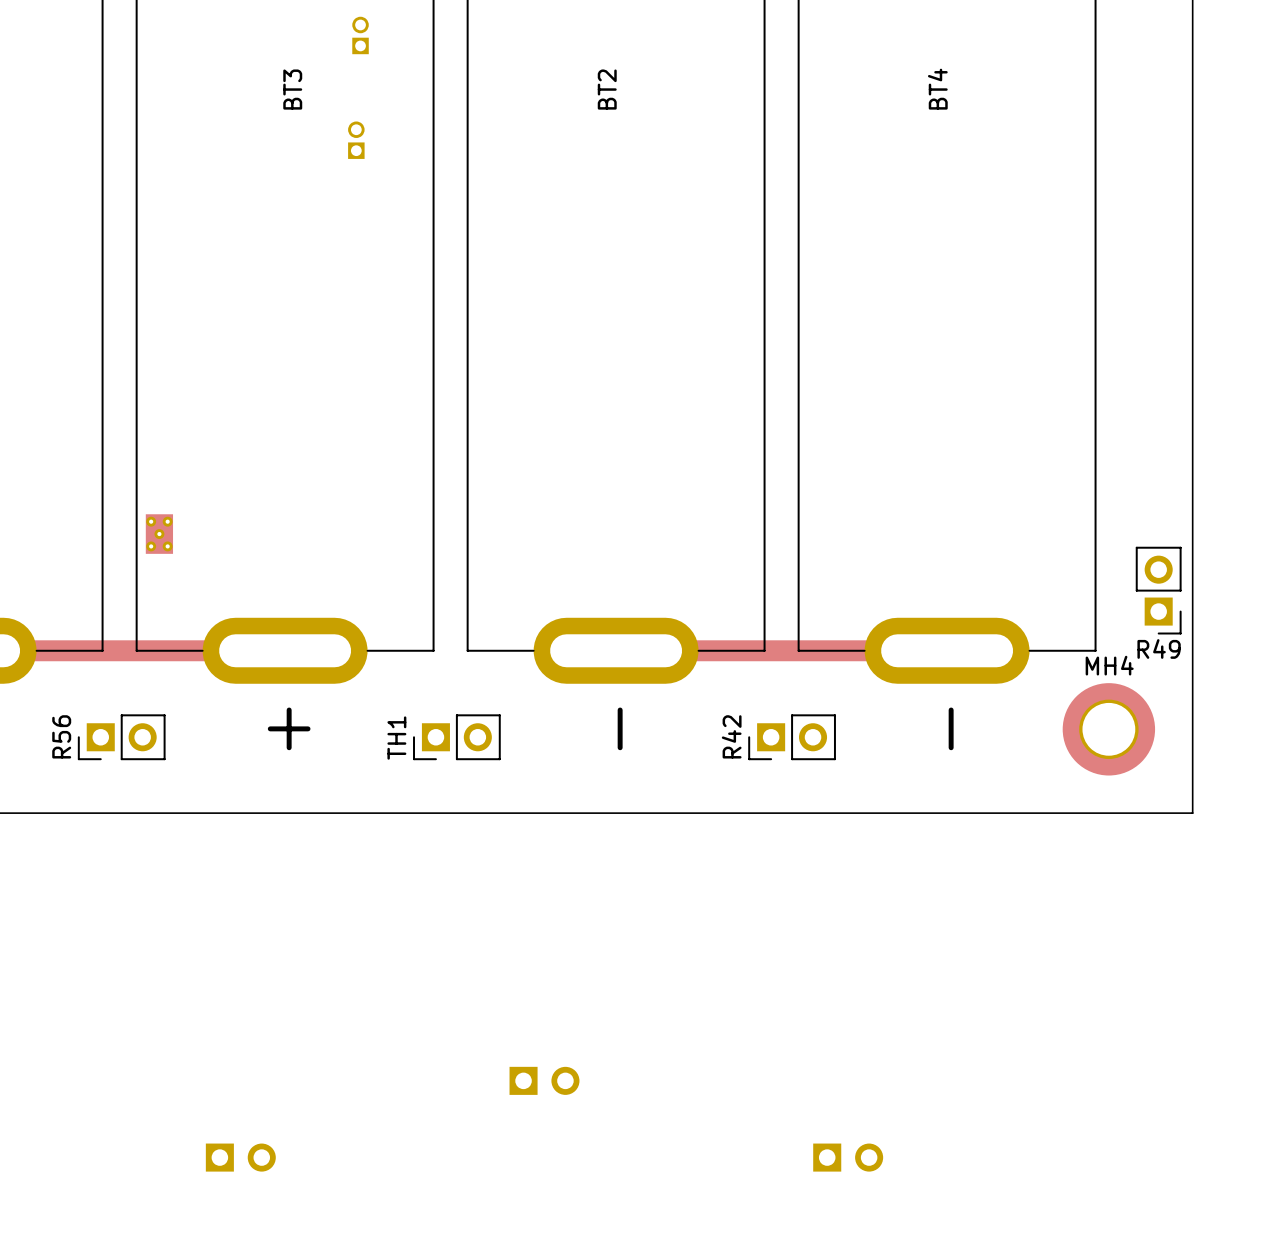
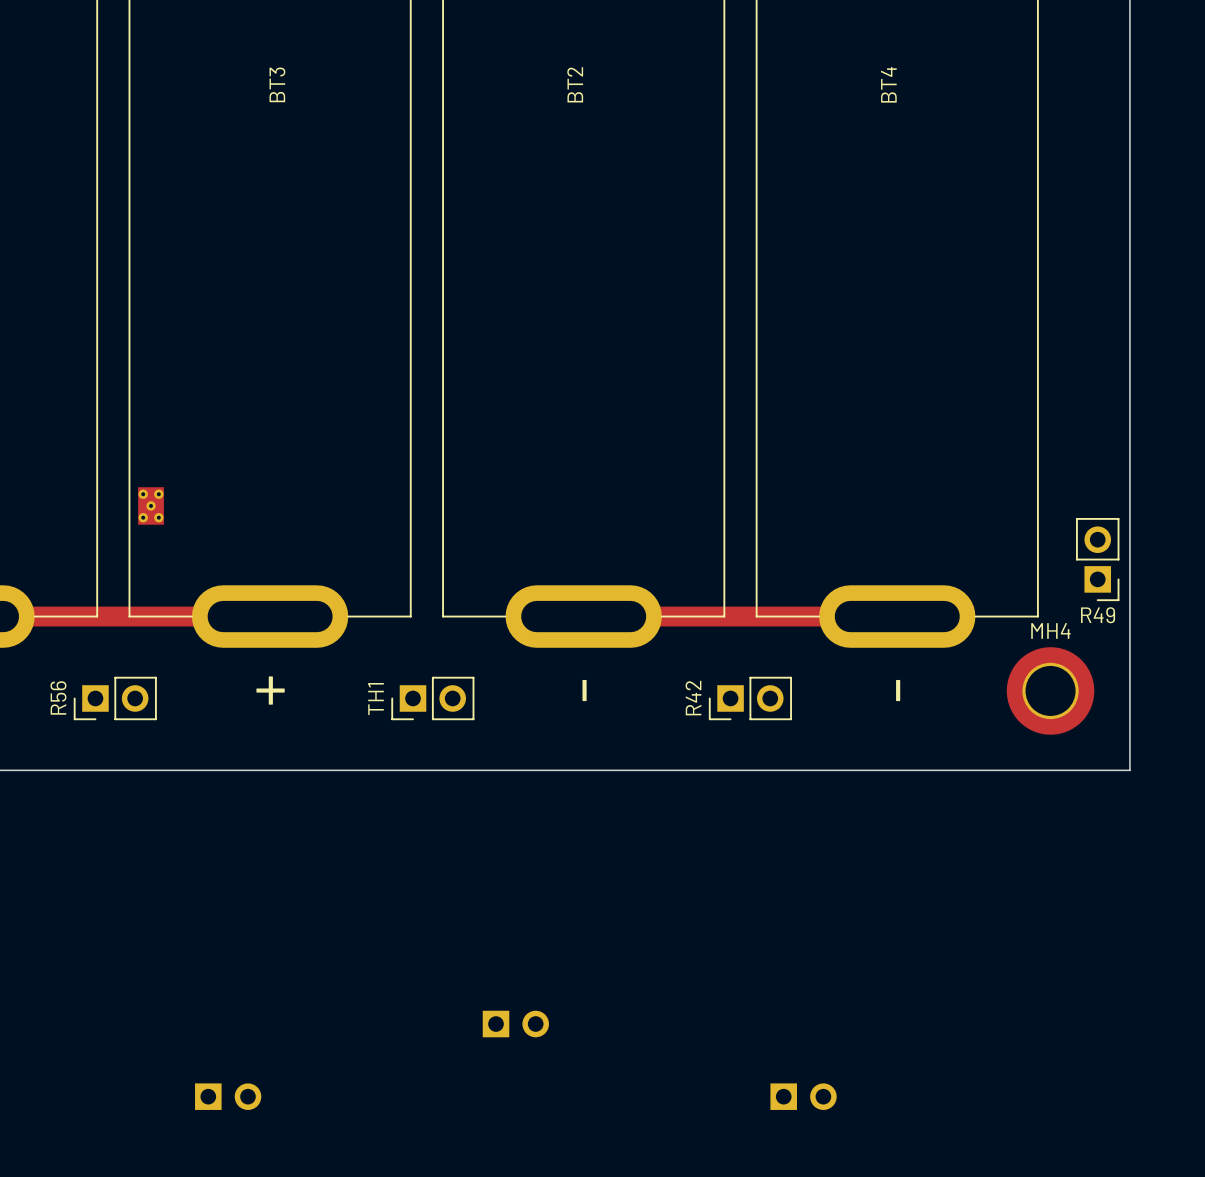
part: (360, 35) -> none
part: (356, 140) -> none

